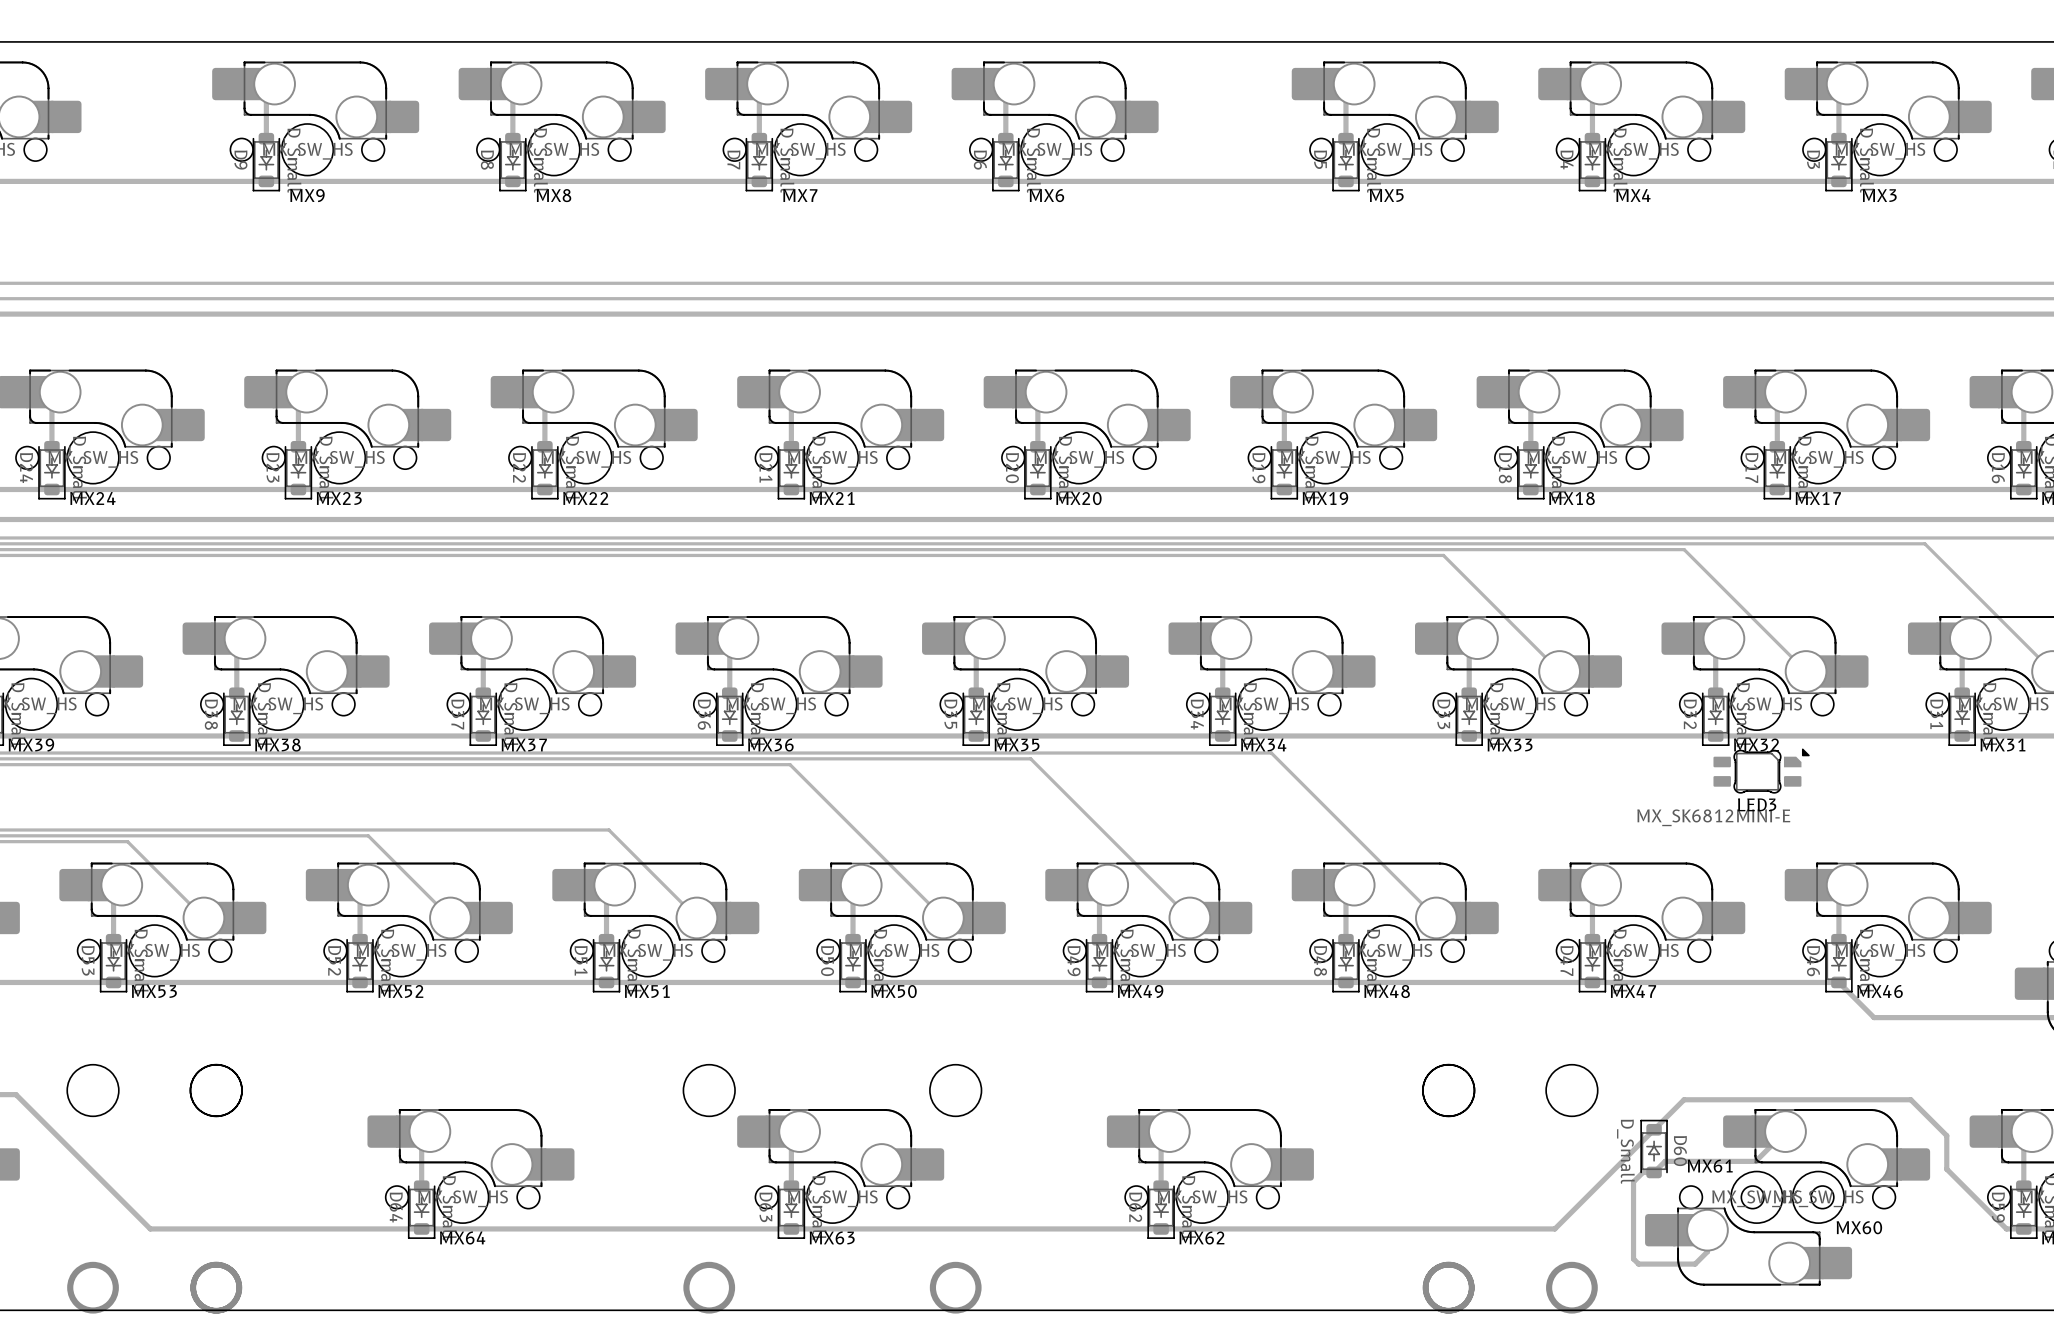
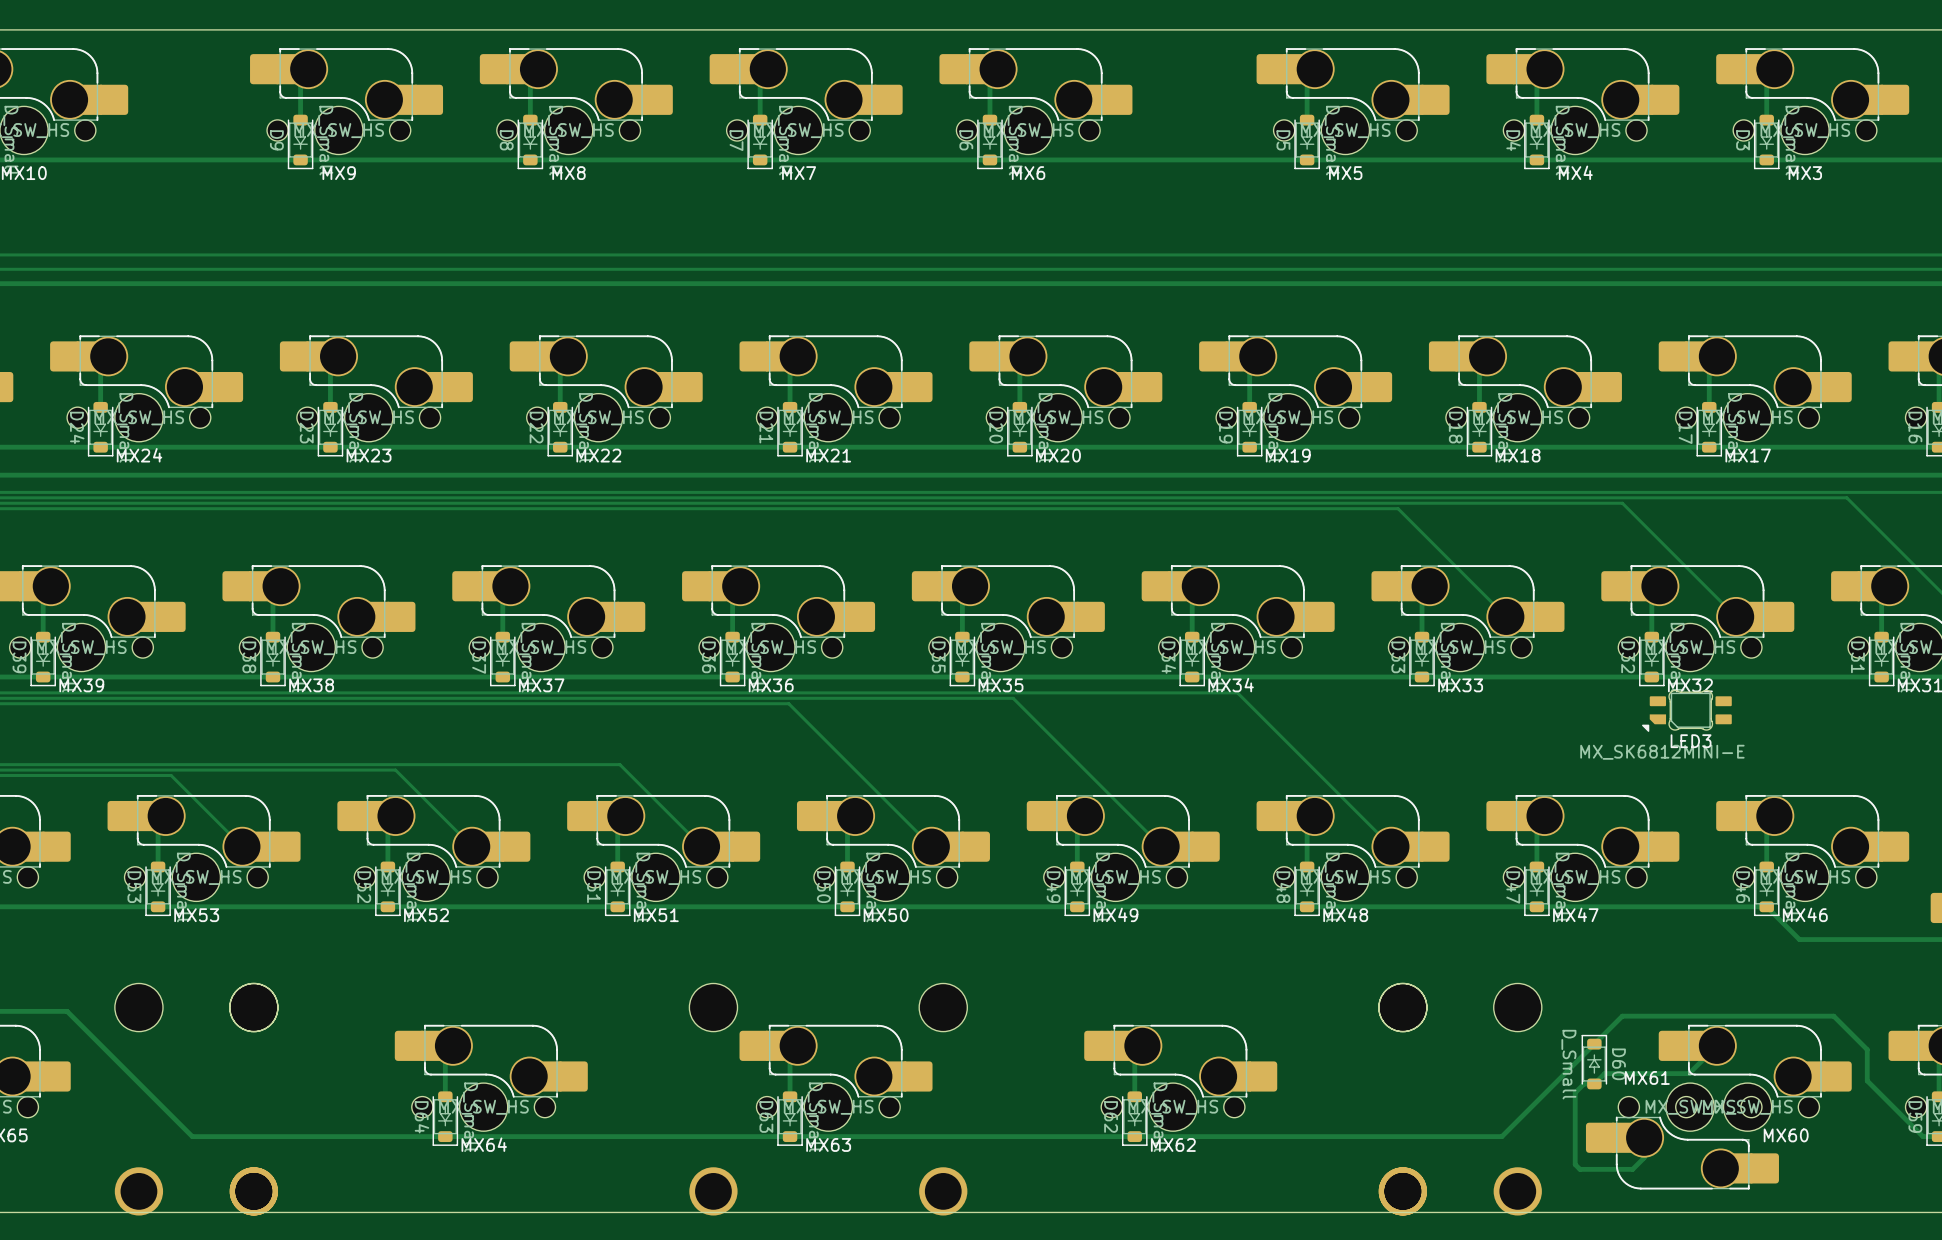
LED3 rotation: 0° (1761, 771) -> 180° (1686, 710)

